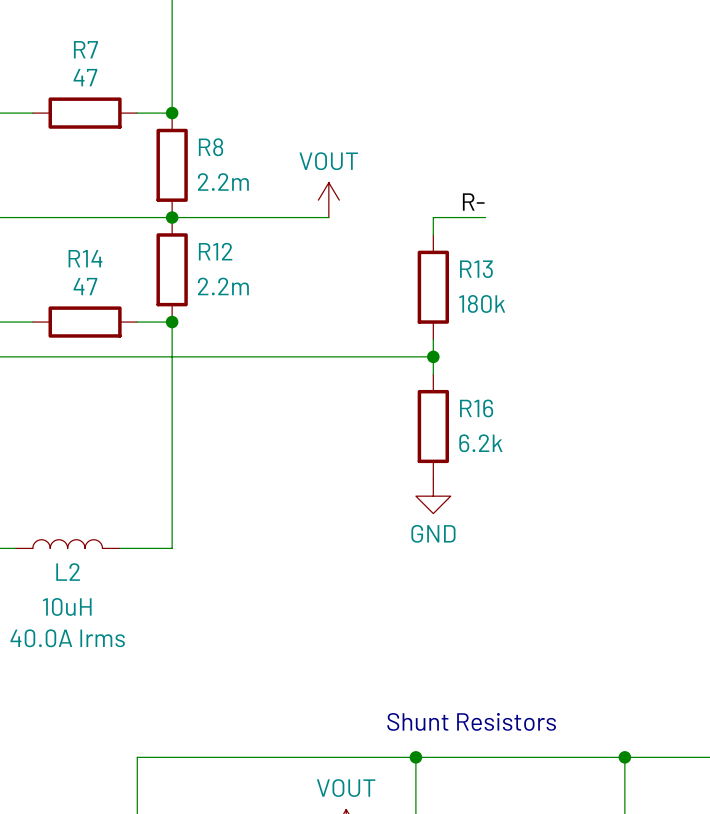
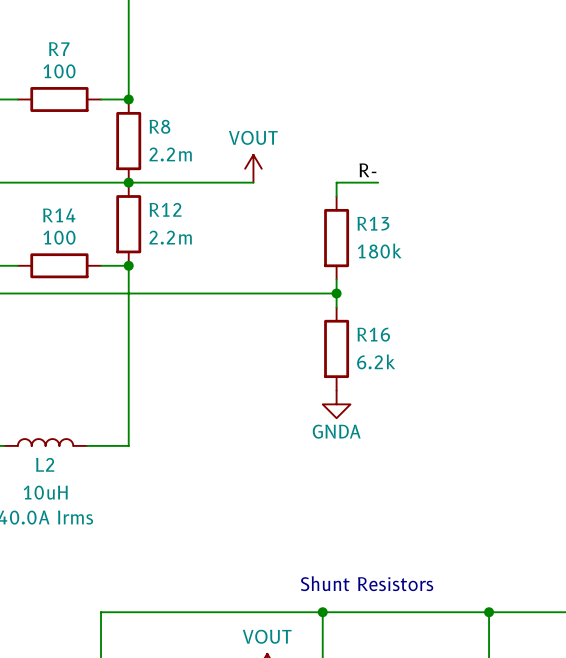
R7 value: 47 (85, 77) -> 100 (59, 71)
R14 value: 47 (85, 286) -> 100 (59, 237)
power symbol: GND (433, 496) -> GNDA (336, 404)

